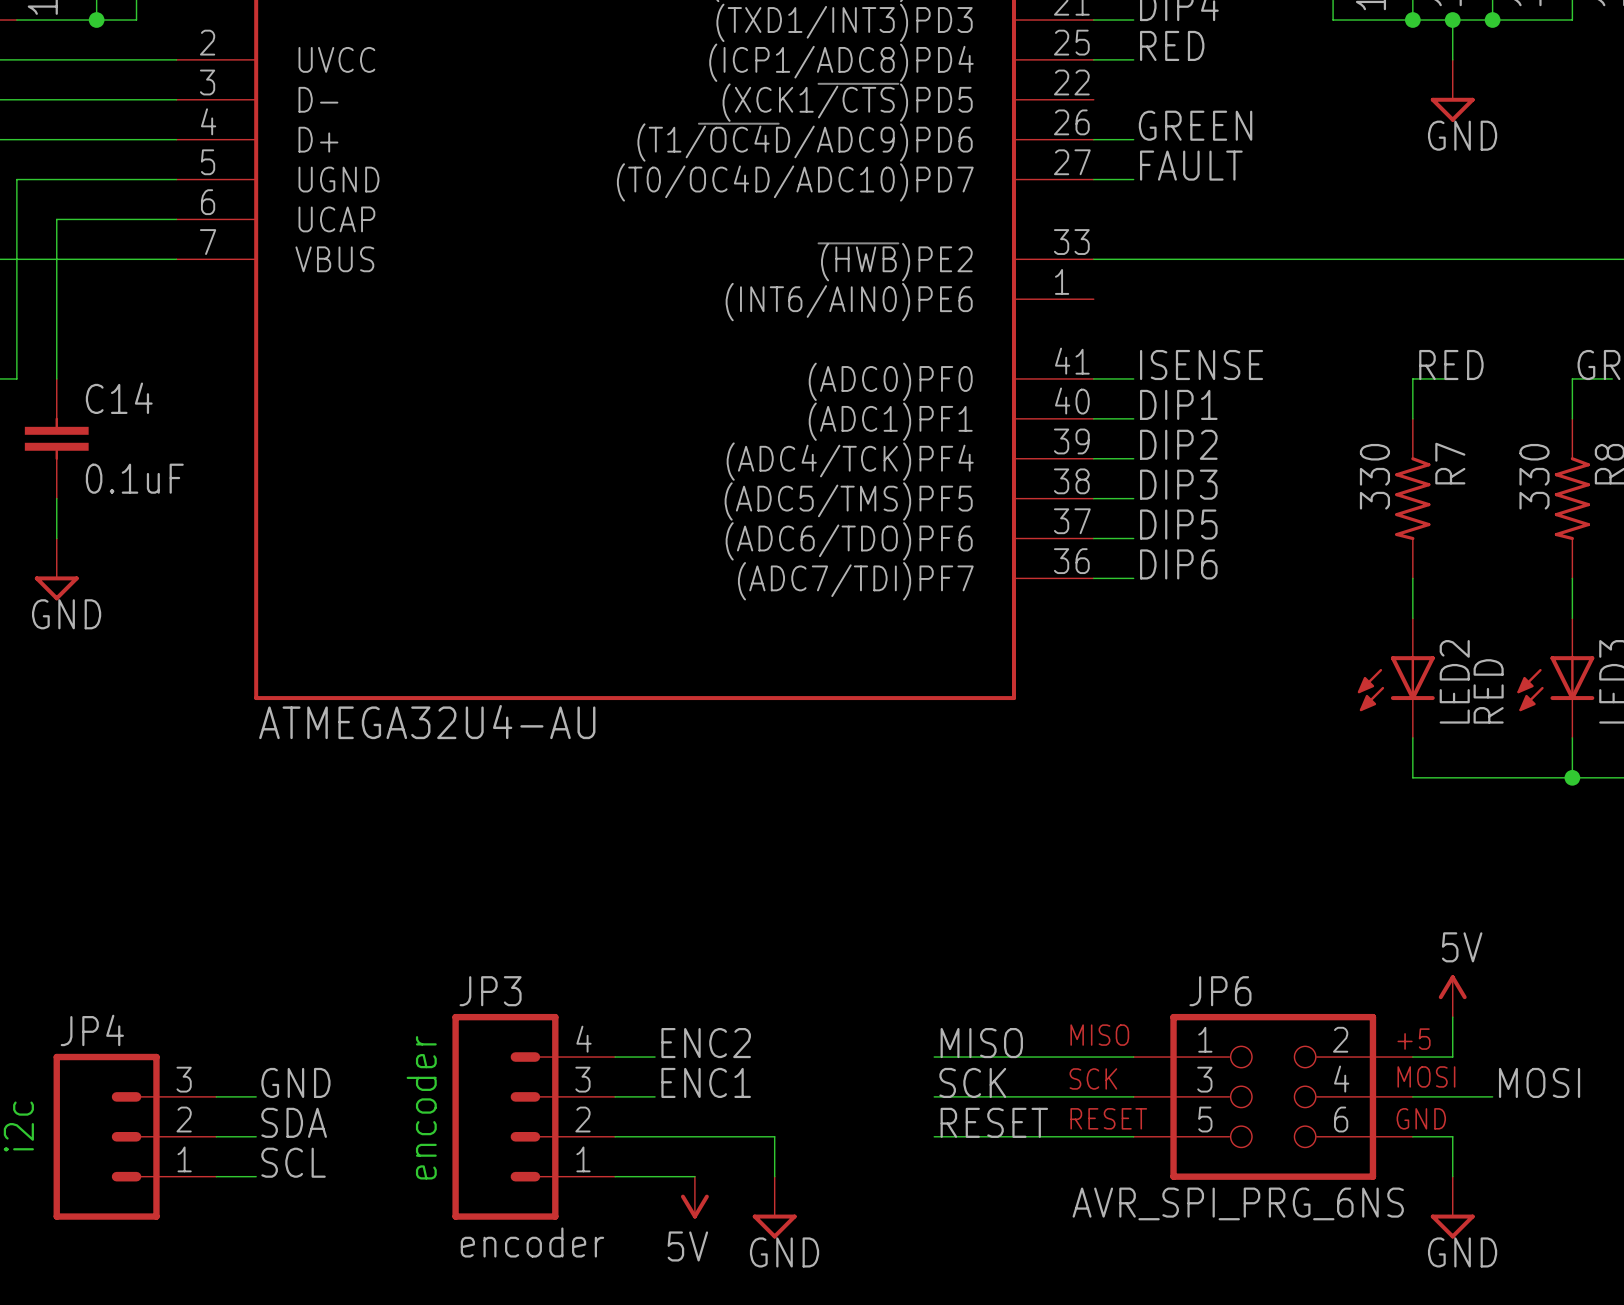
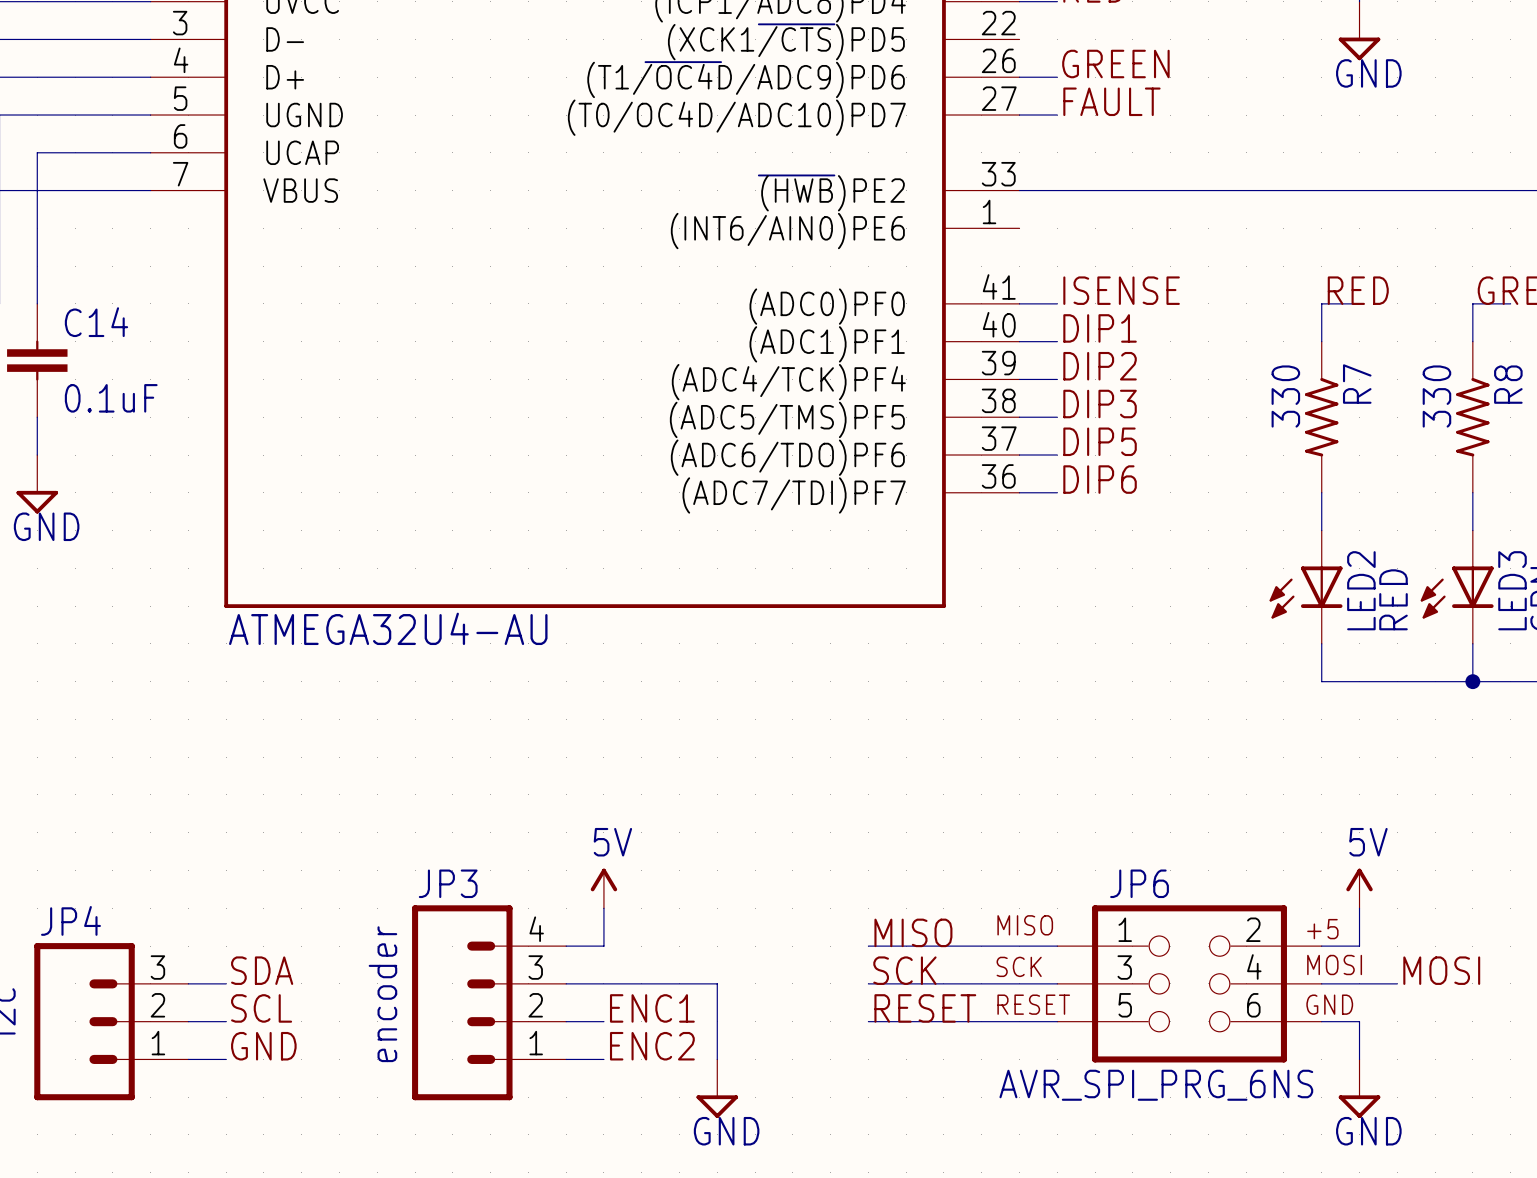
wire: none -> (603, 908) (603, 946)
label position: ENC2 (706, 1043) -> ENC2 (652, 1046)
label: GND (295, 1082) -> SDA (262, 970)
label position: ENC1 (706, 1082) -> ENC1 (652, 1008)
label: SDA (294, 1122) -> SCL (261, 1008)
wire: (655, 1136) (774, 1136) -> (603, 983) (717, 983) (717, 1021)
label: SCL (293, 1162) -> GND (263, 1046)
wire: (655, 1176) (694, 1176) -> none
power symbol position: 5V (694, 1197) -> 5V (603, 888)
power symbol rotation: 0° (694, 1206) -> 180° (603, 879)
JP3 value: encoder (532, 1242) -> none

